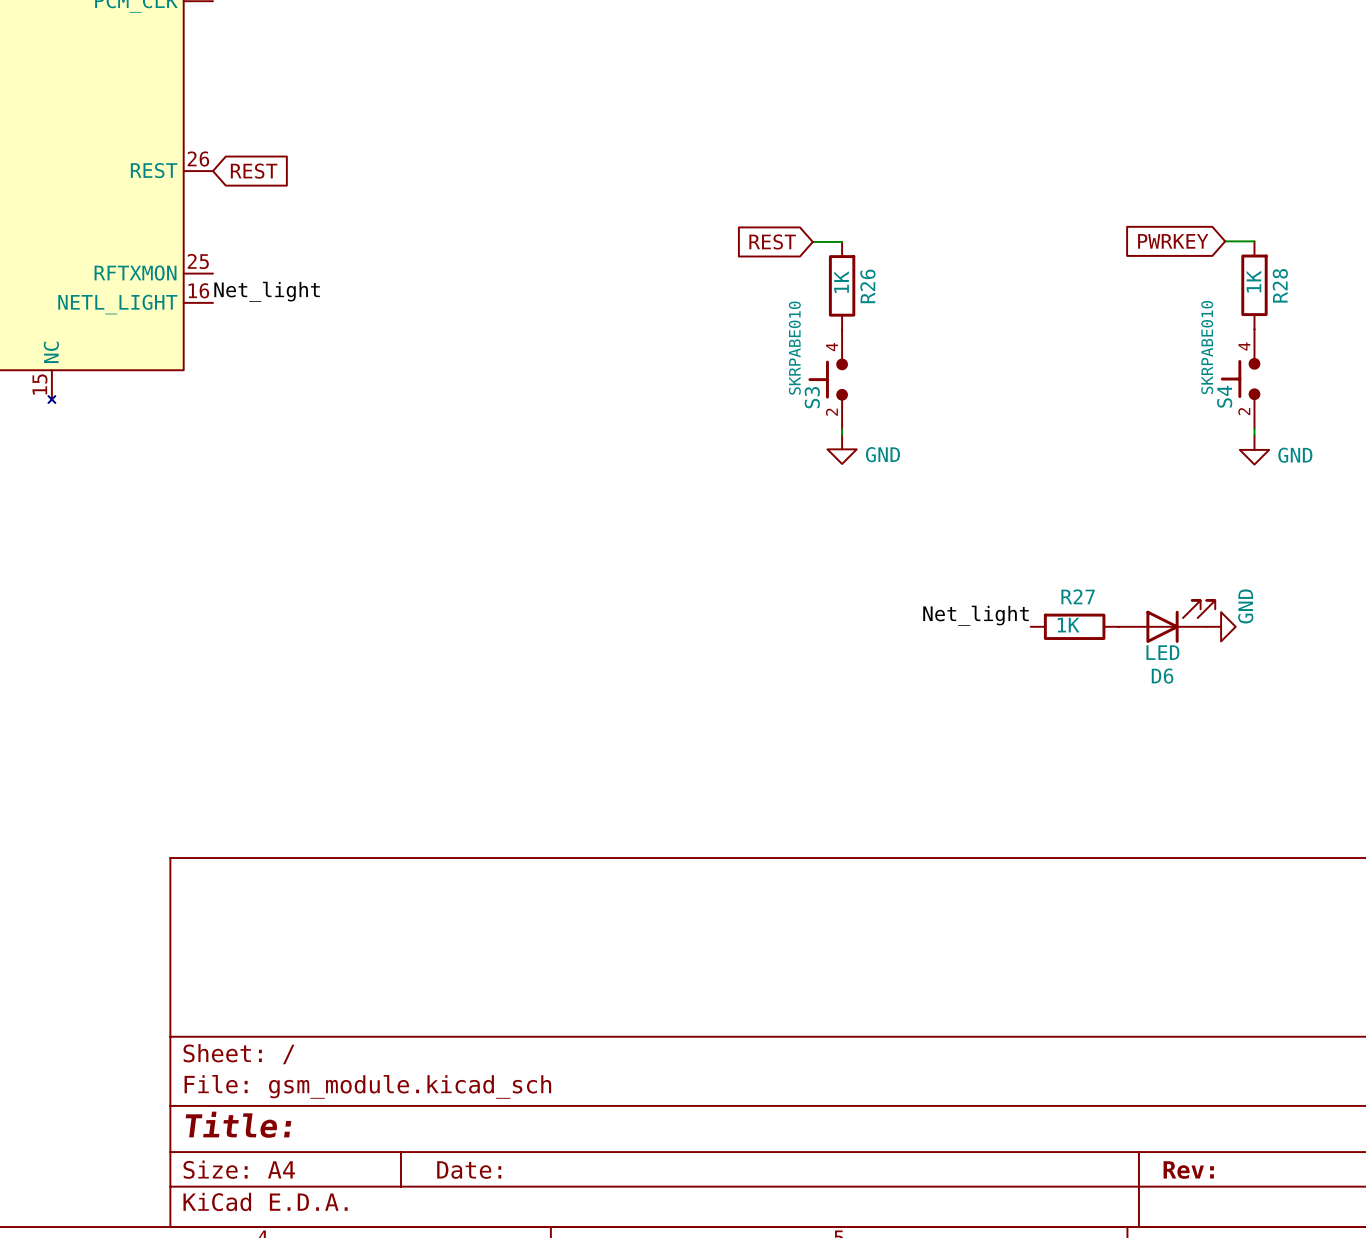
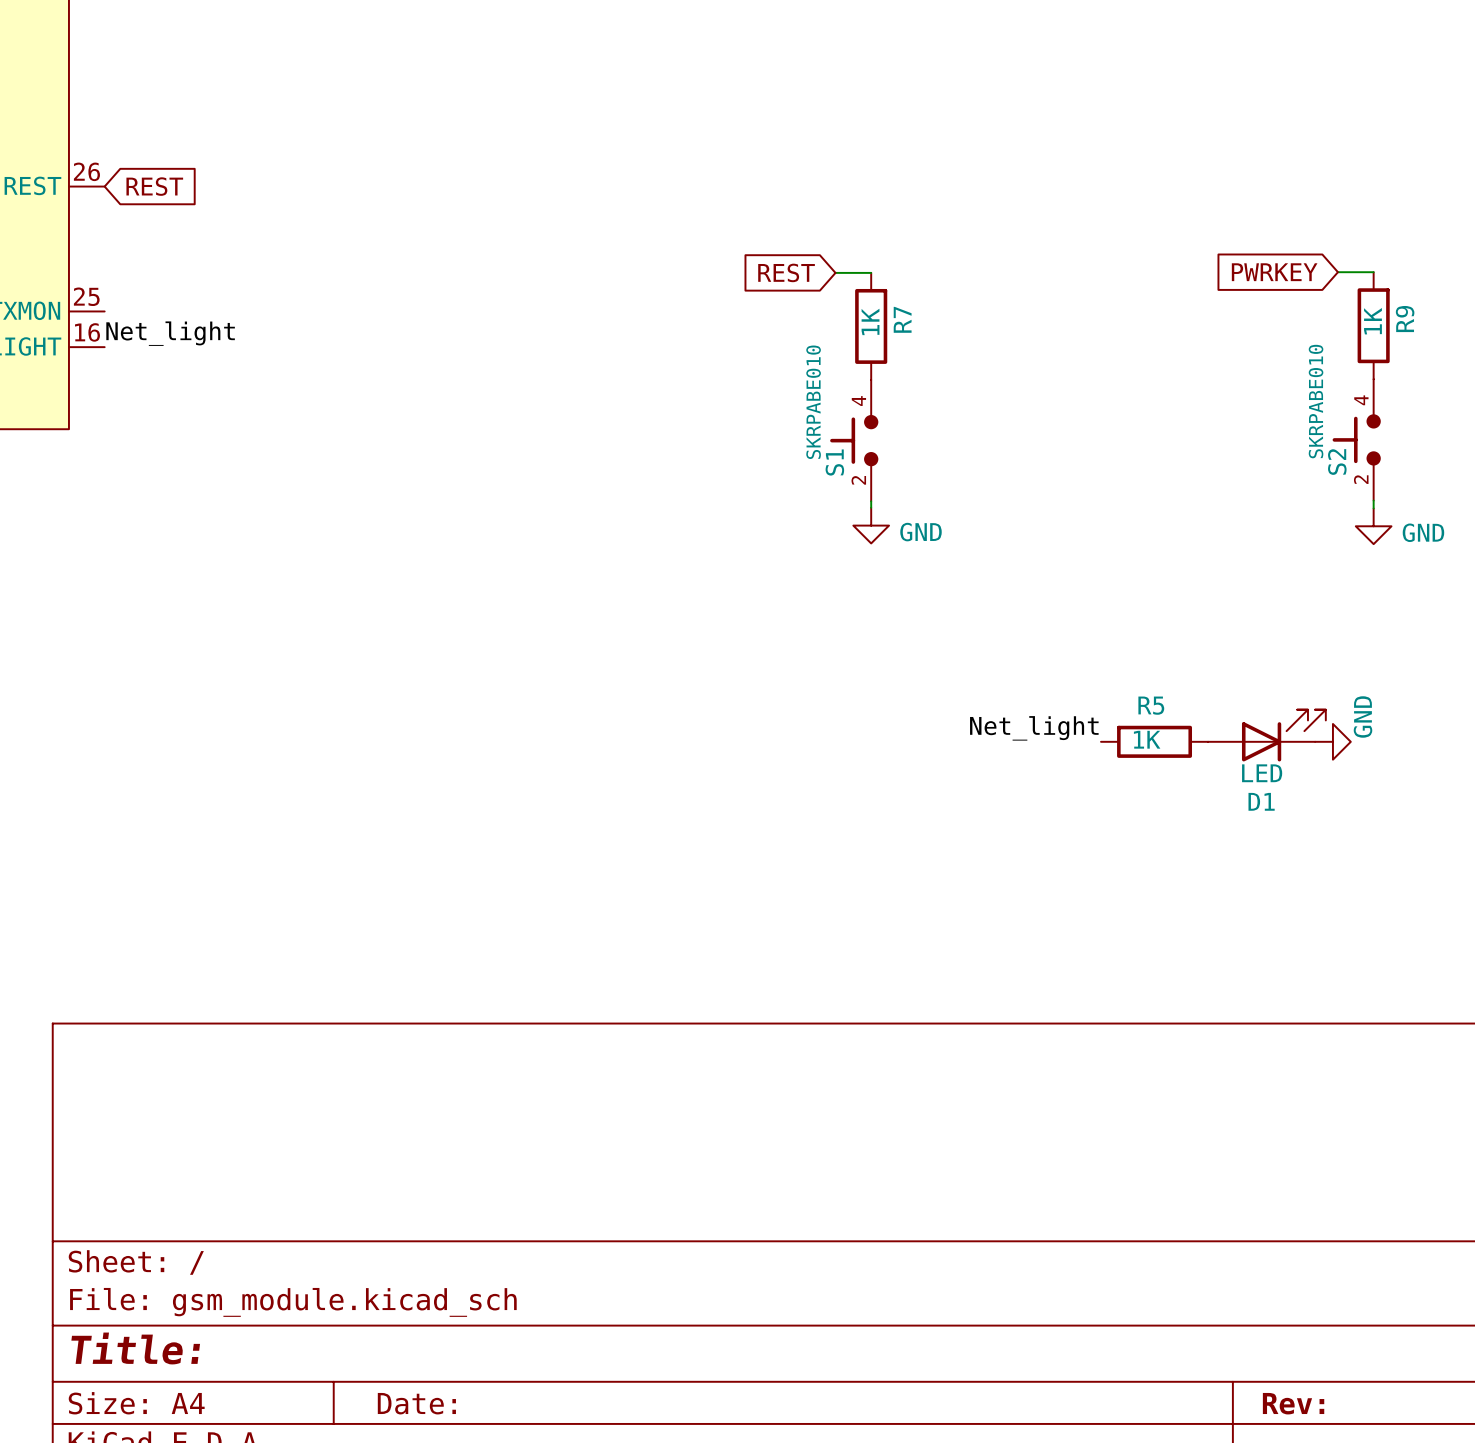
R28 name: R28 (1280, 285) -> R9 (1405, 319)
R26 name: R26 (867, 286) -> R7 (902, 319)
S4 name: S4 (1224, 396) -> S2 (1337, 462)
S3 name: S3 (812, 397) -> S1 (834, 462)
R27 name: R27 (1078, 596) -> R5 (1151, 705)
D6 name: D6 (1162, 676) -> D1 (1261, 801)

